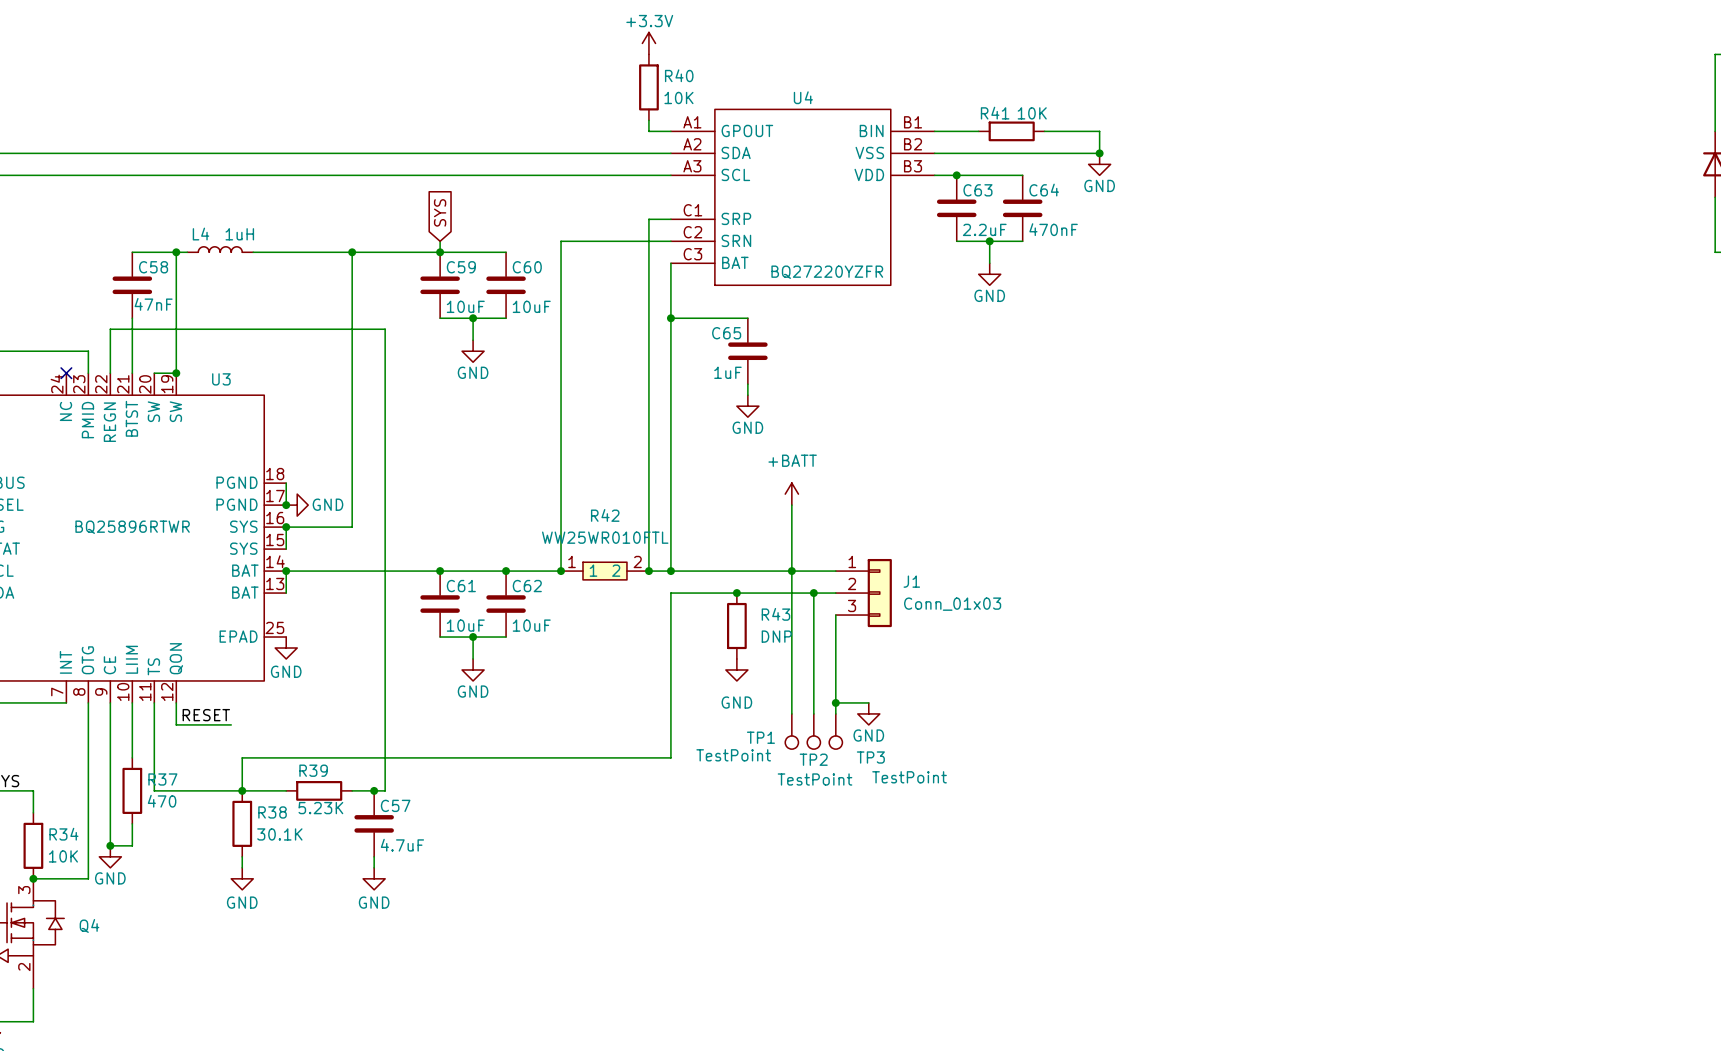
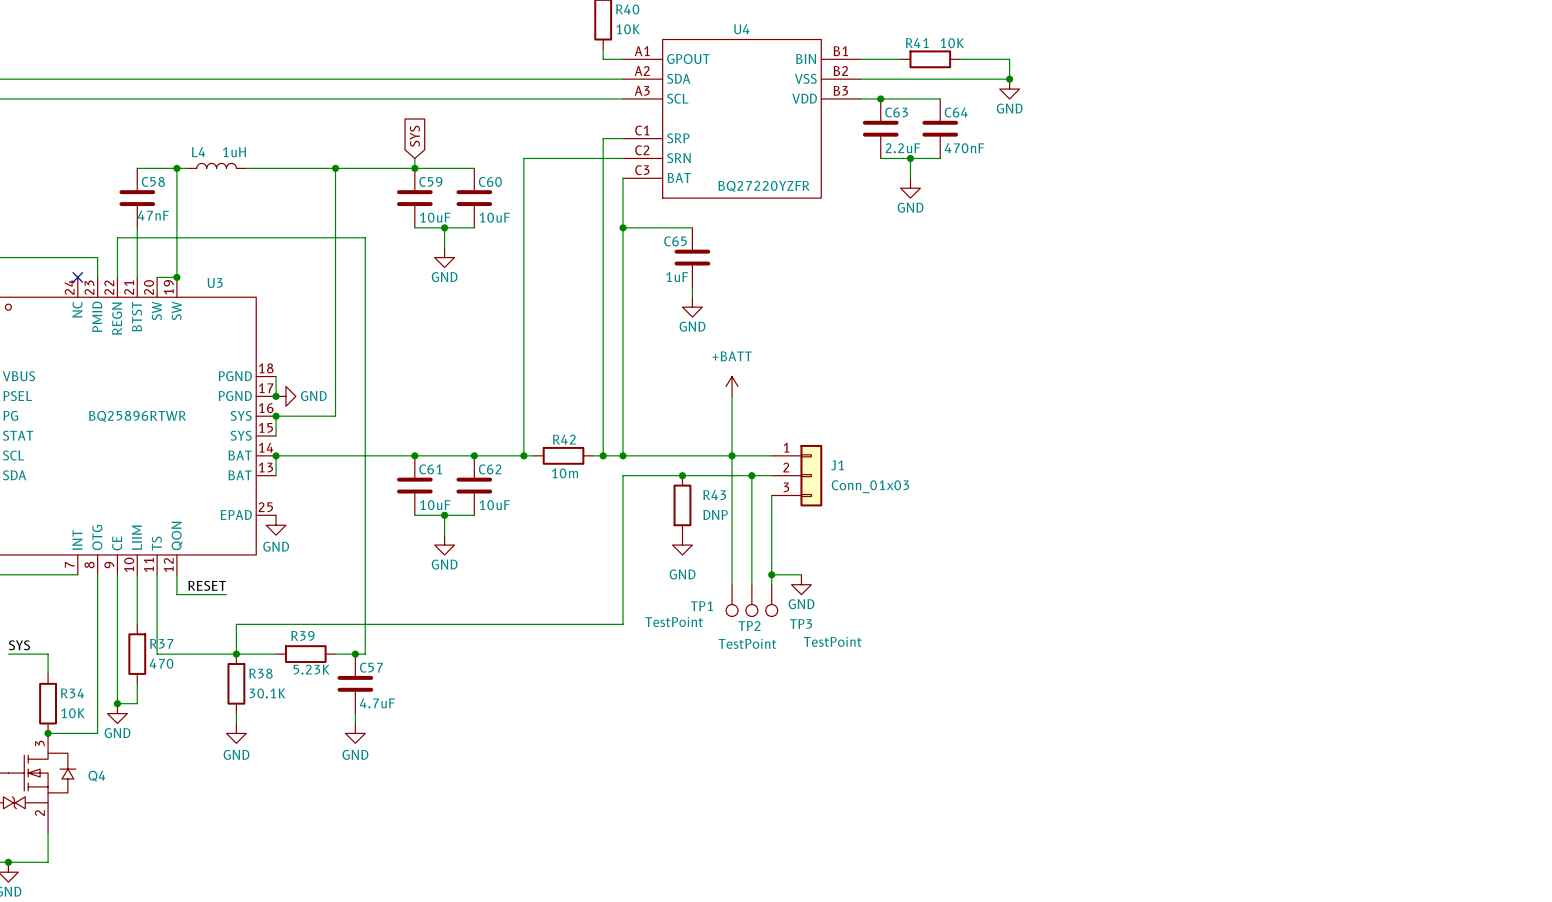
R42 name position: R42 (605, 515) -> R42 (564, 439)
R42 value: WW25WR010FTL (605, 537) -> 10m (565, 473)
R42 symbol: [561, 562, 649, 580] -> [533, 446, 594, 465]

